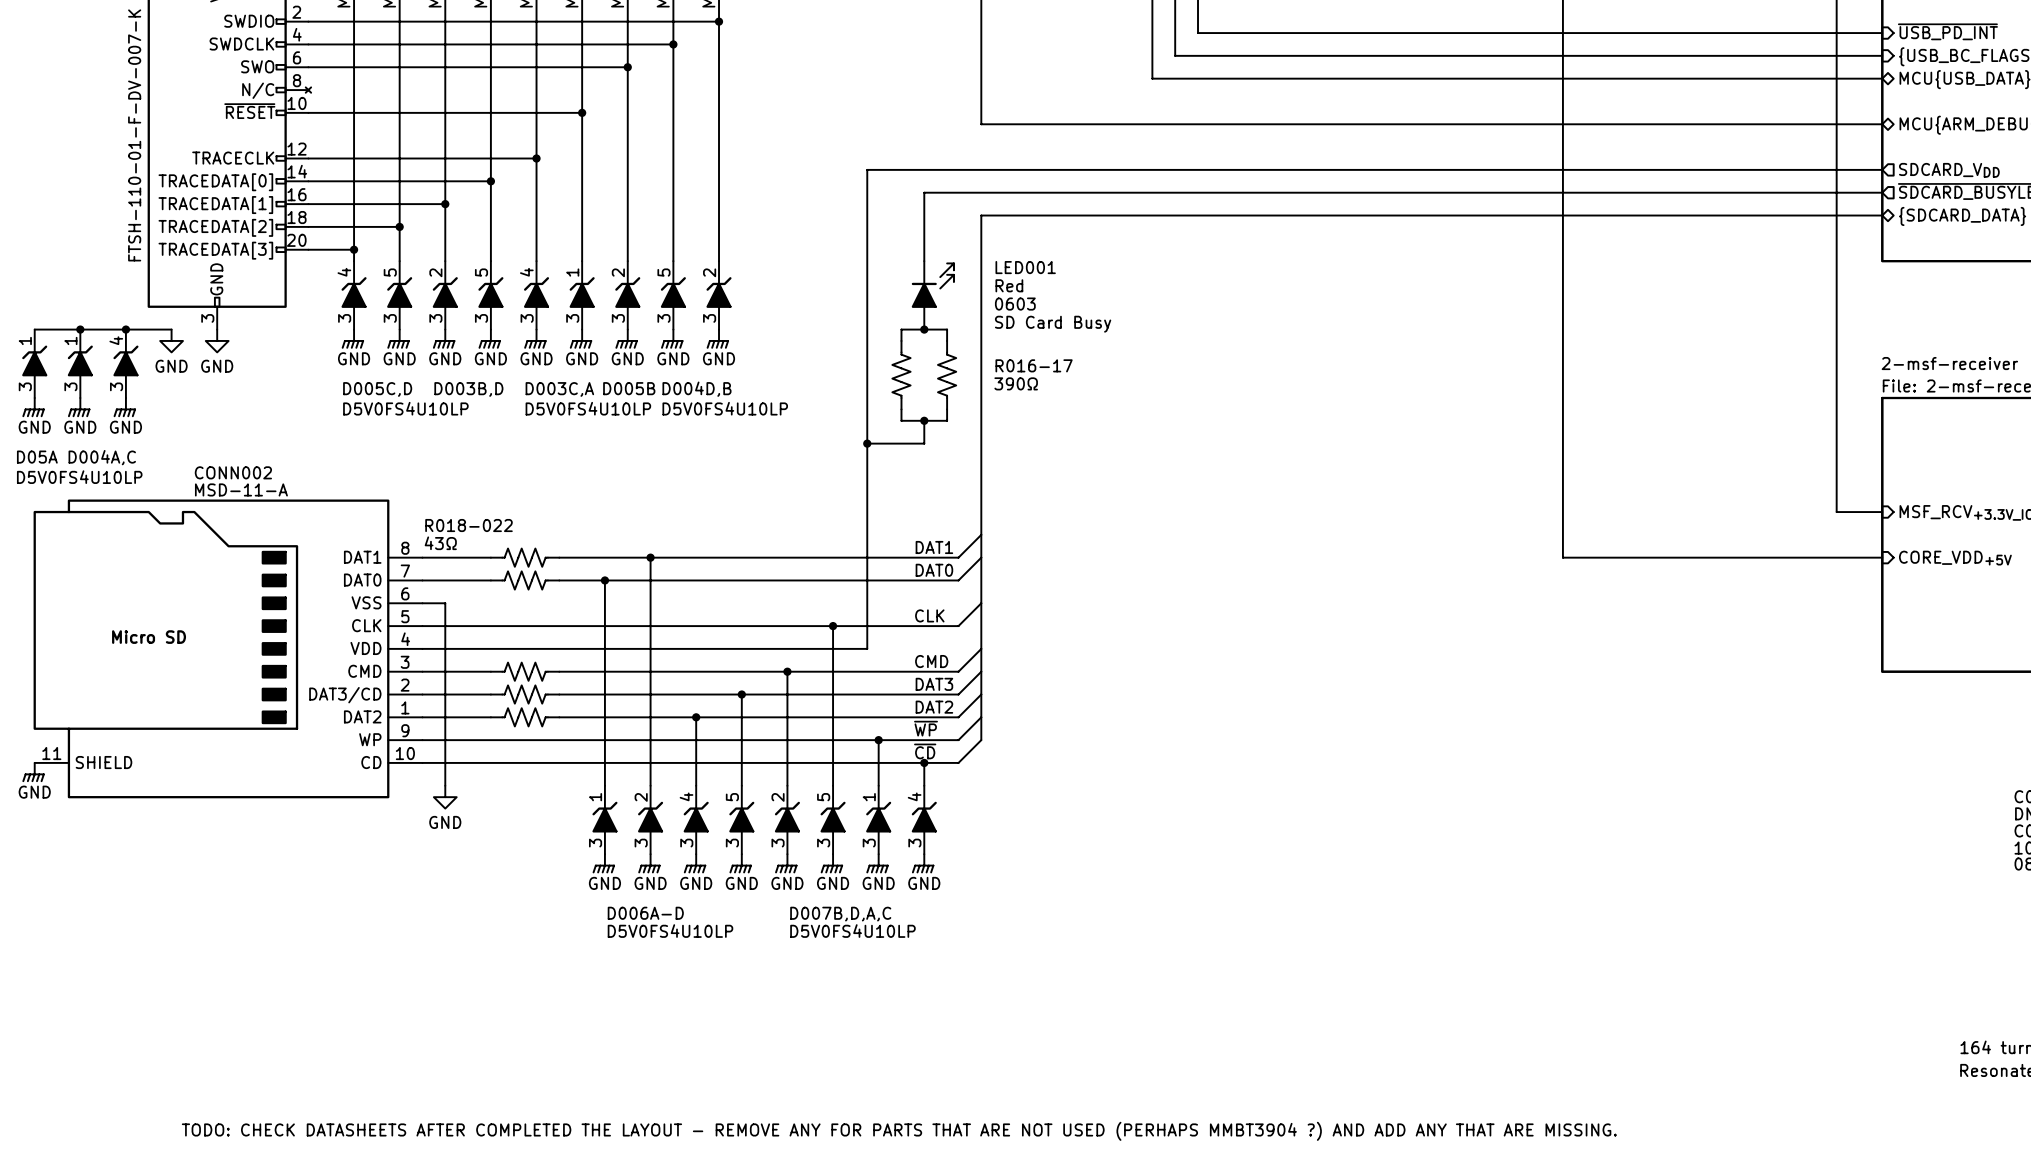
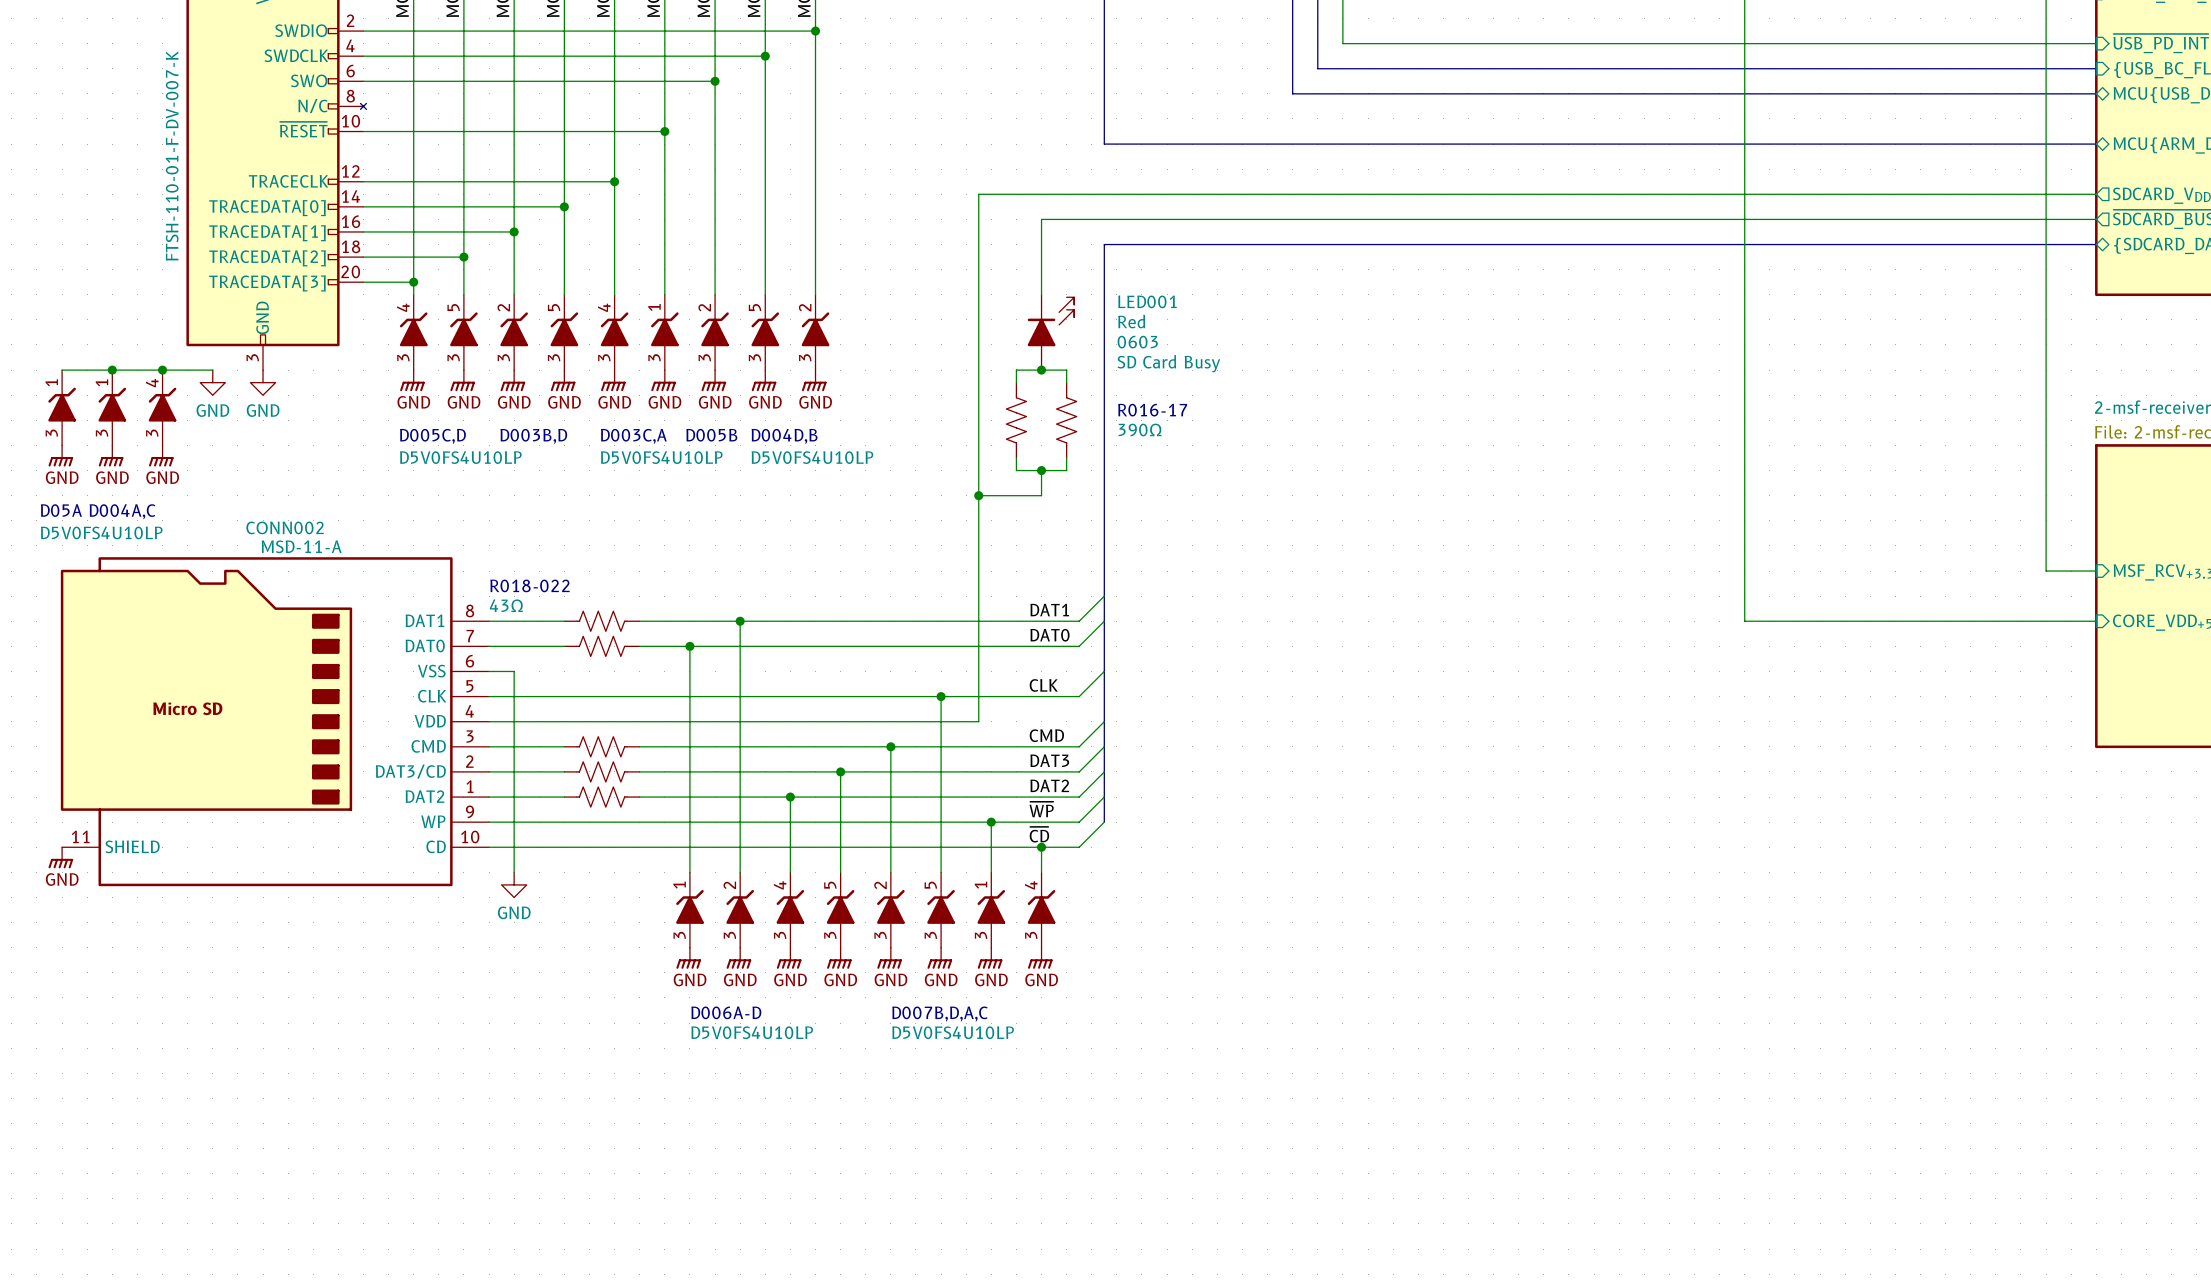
text: TODO: CHECK DATASHEETS AFTER COMPLETED THE LAYOUT - REMOVE ANY FOR PARTS THAT ARE NOT USED (PERHAPS MMBT3904 ?) AND ADD ANY THAT ARE MISSING. (899, 1131) -> none

